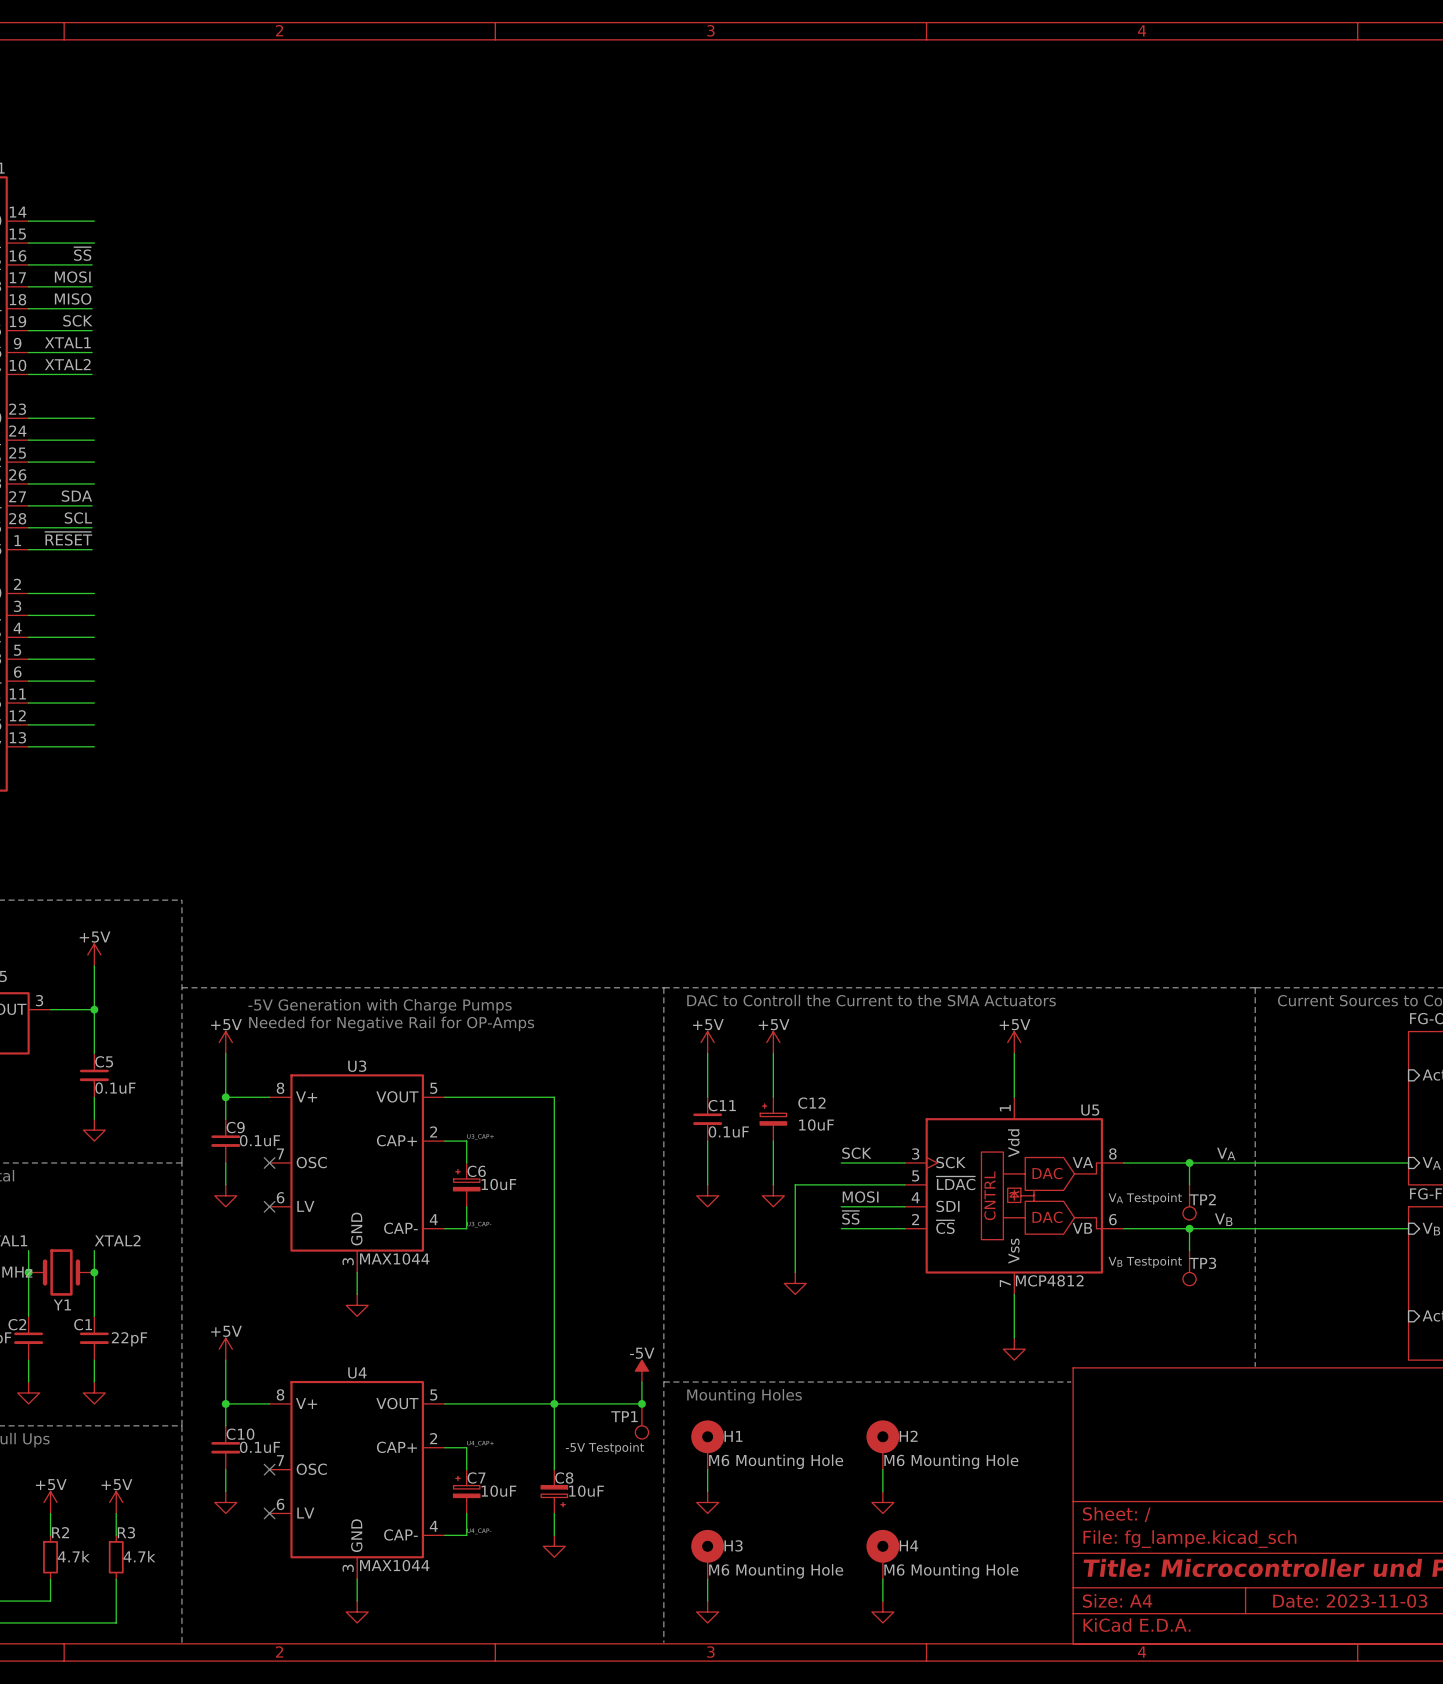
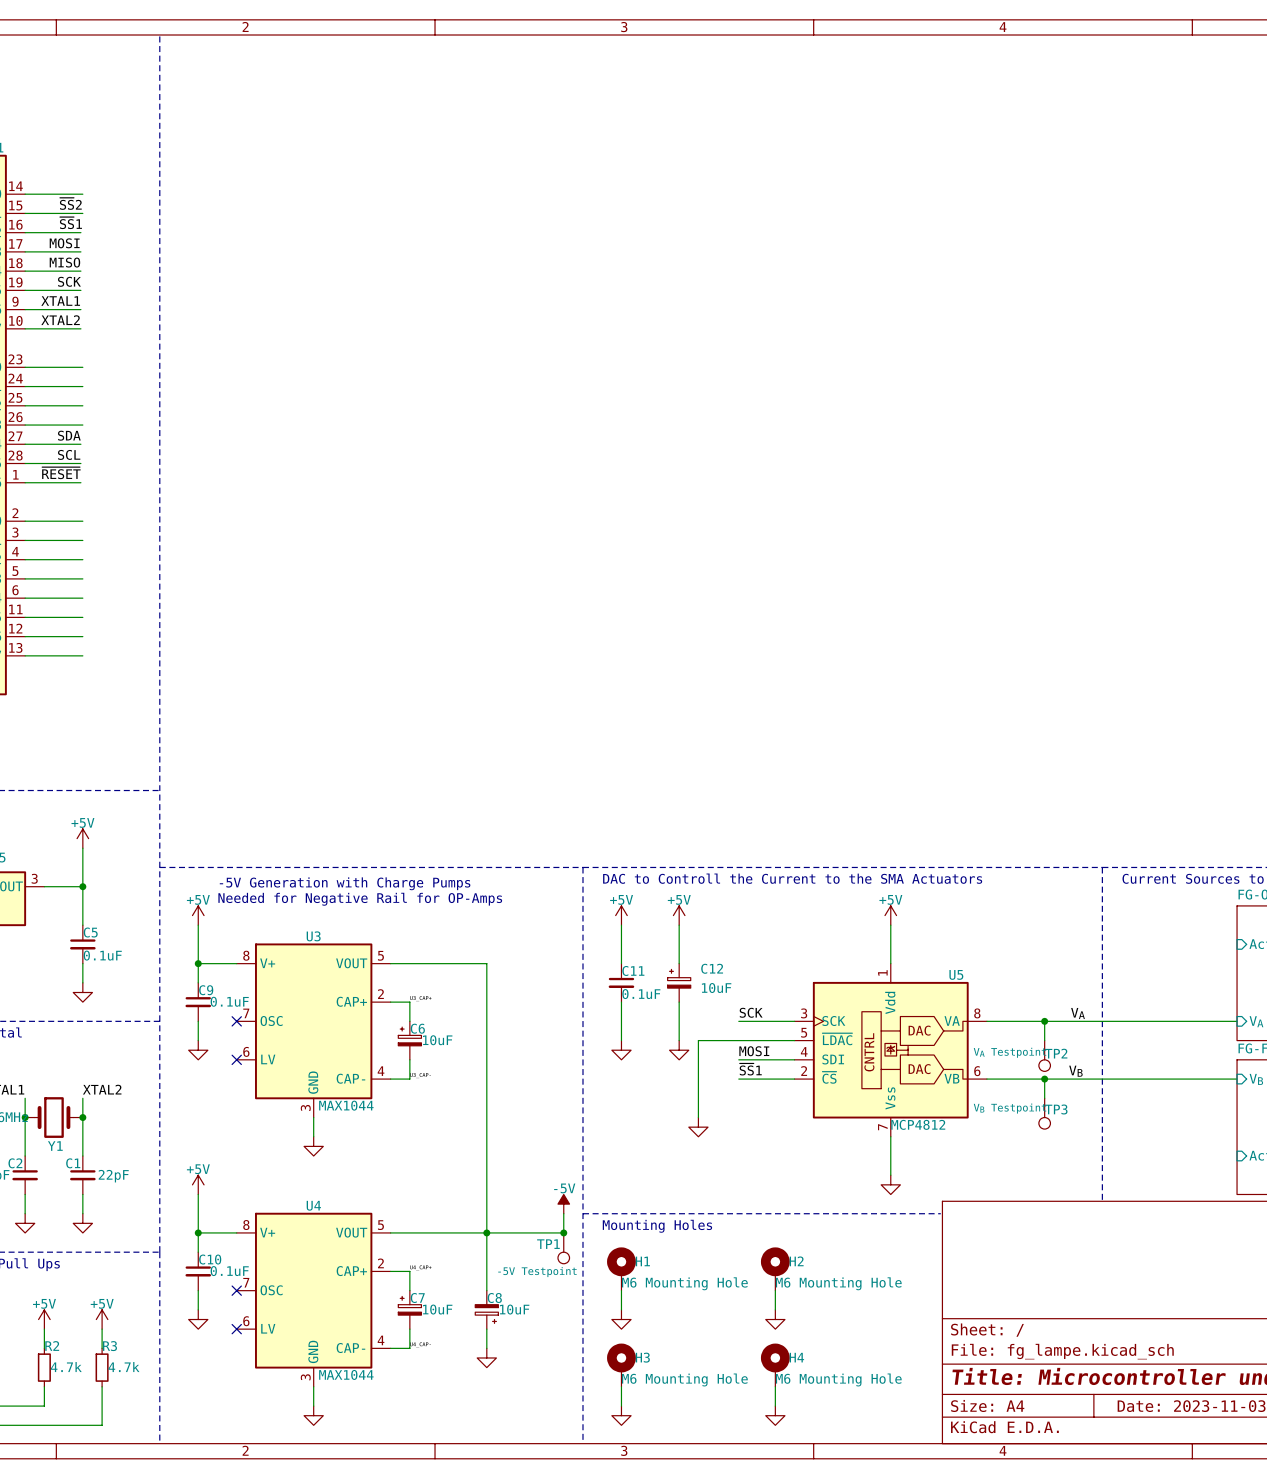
line: none -> (159, 36) (159, 790)
label: none -> ~{SS}2 (70, 203)
label: ~{SS} (82, 254) -> ~{SS}1 (70, 223)
label: ~{SS} (850, 1217) -> ~{SS}1 (750, 1069)

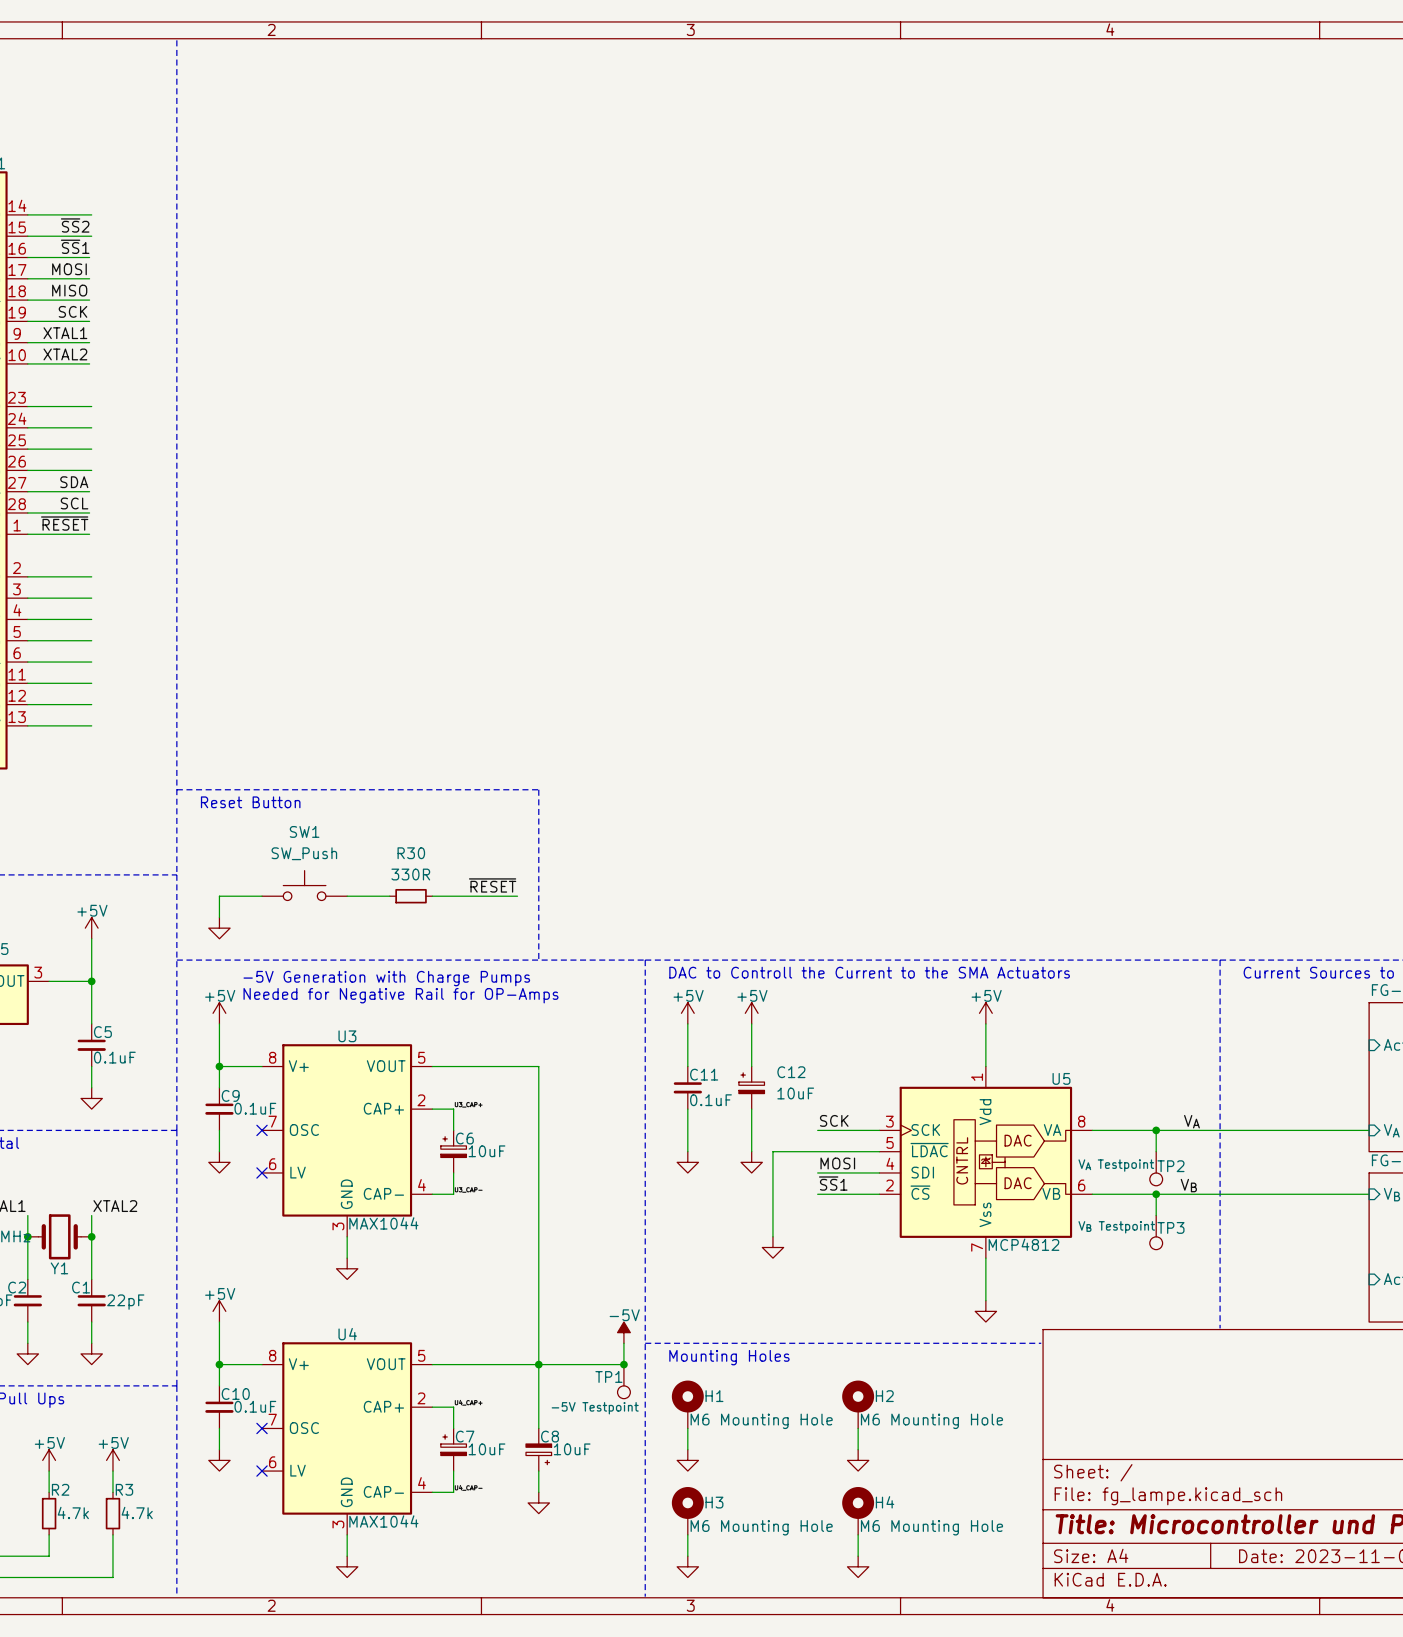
line: none -> (176, 789) (538, 789) (538, 960)
text: none -> Reset Button (250, 802)
SW1: none -> SW_Push (304, 885)
label: none -> ~{RESET} (492, 885)
wire: none -> (262, 896) (219, 896) (219, 917)
wire: none -> (347, 896) (389, 896)
R30: none -> 330R (411, 896)
wire: none -> (432, 896) (517, 896)
power symbol: none -> (219, 928)

